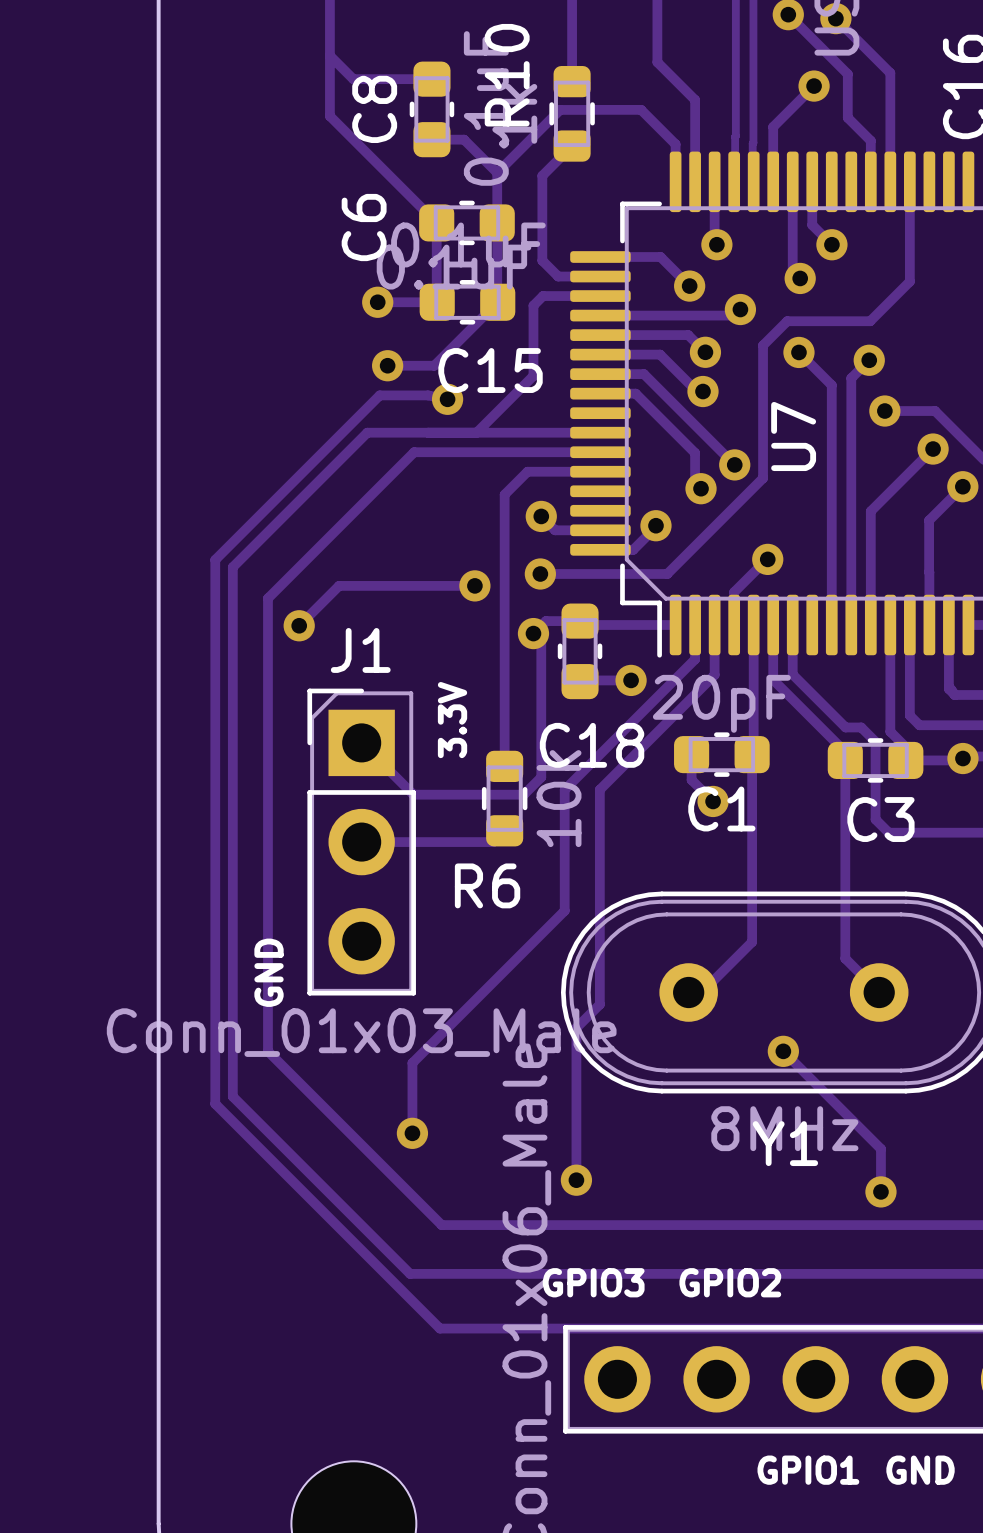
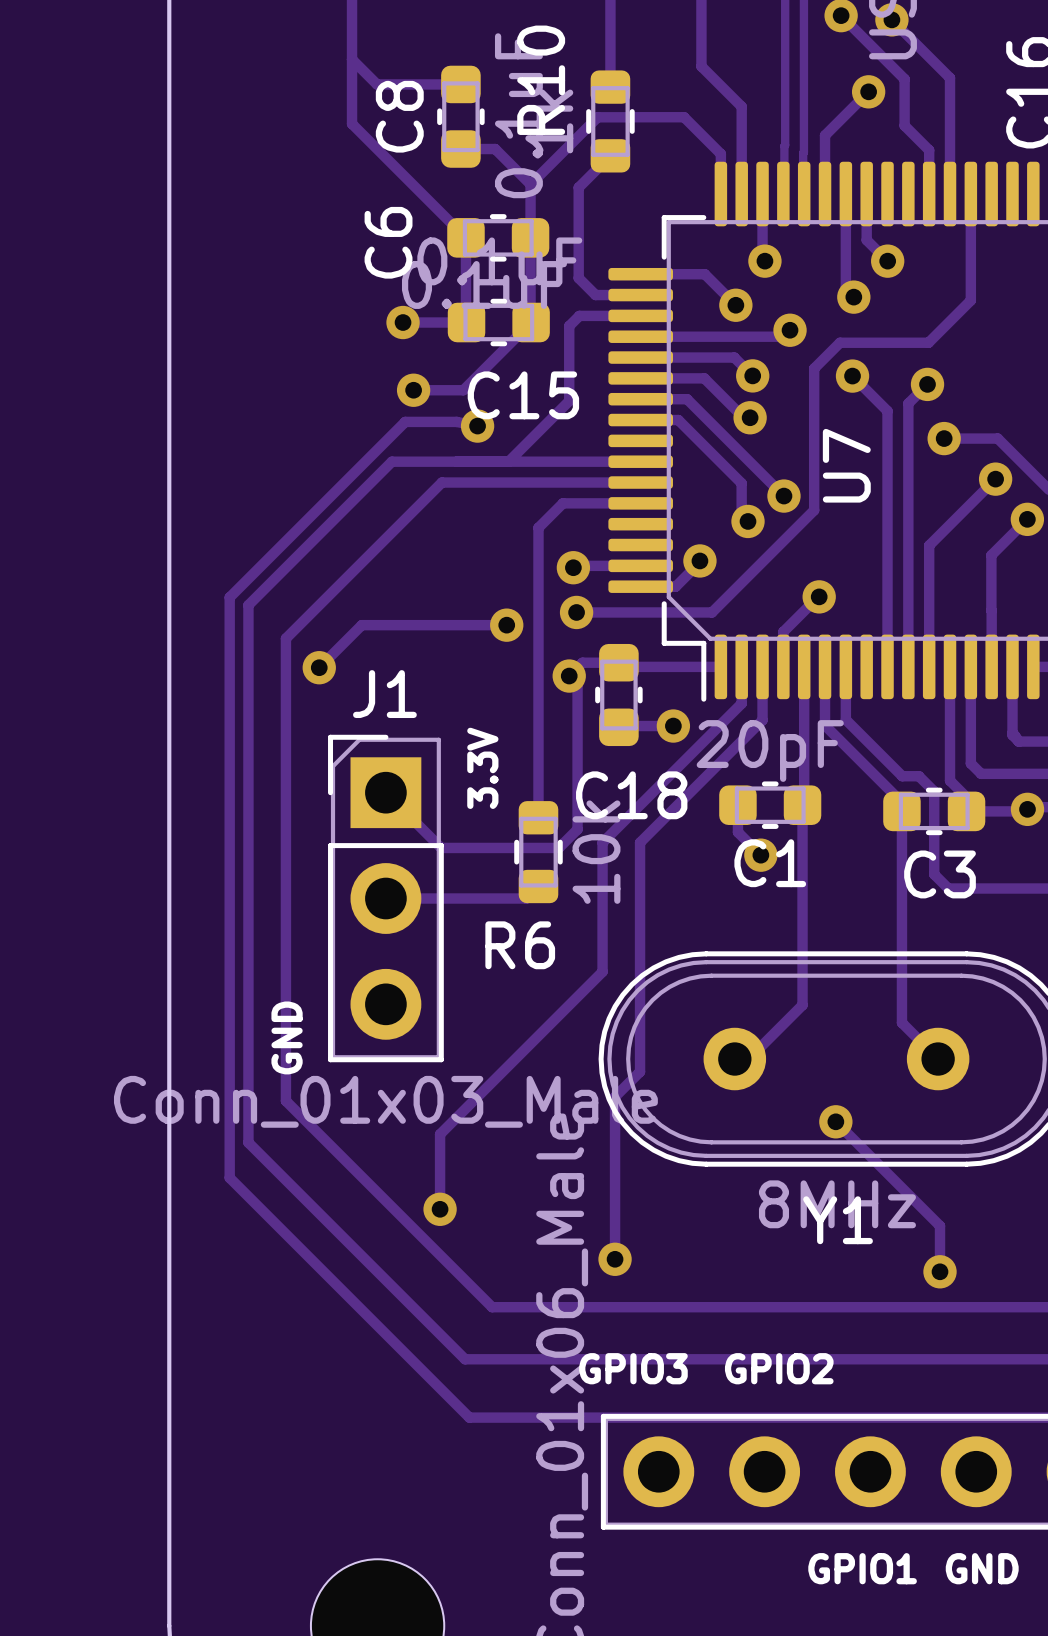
via position: (541, 516) -> (573, 567)
track: (267, 1031) (267, 1051) (441, 1225) (461, 1225) -> (285, 1100) (492, 1307)
track: (232, 1070) (232, 1096) (410, 1273) (435, 1273) -> (248, 1142) (465, 1359)

